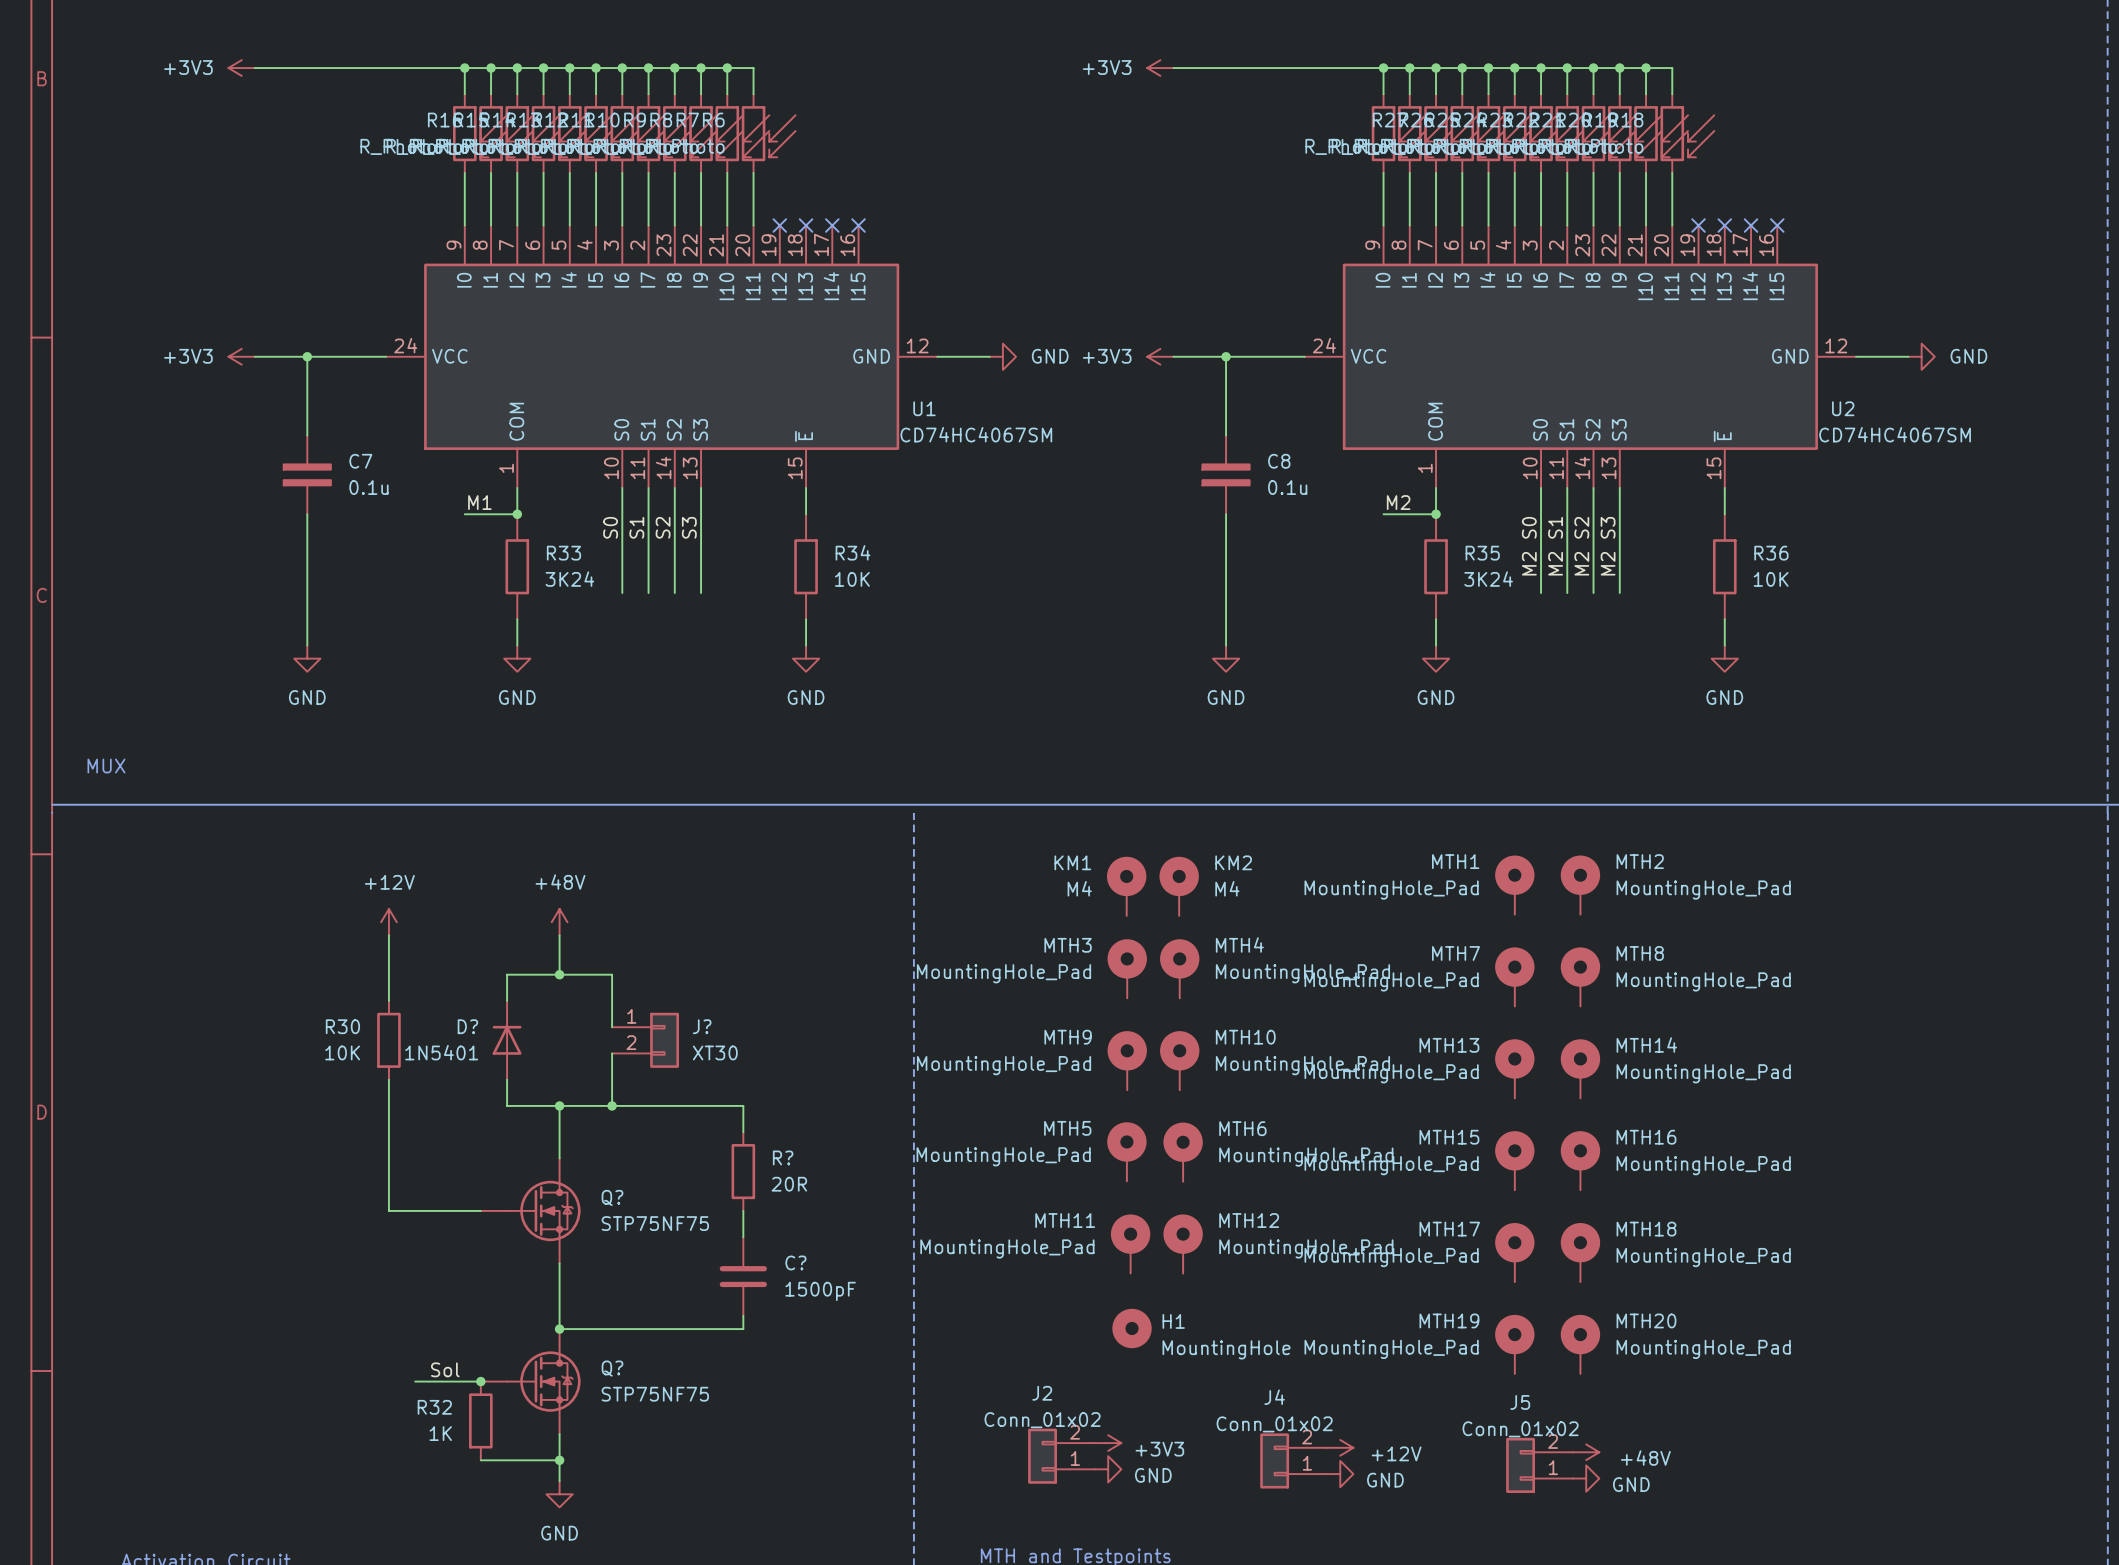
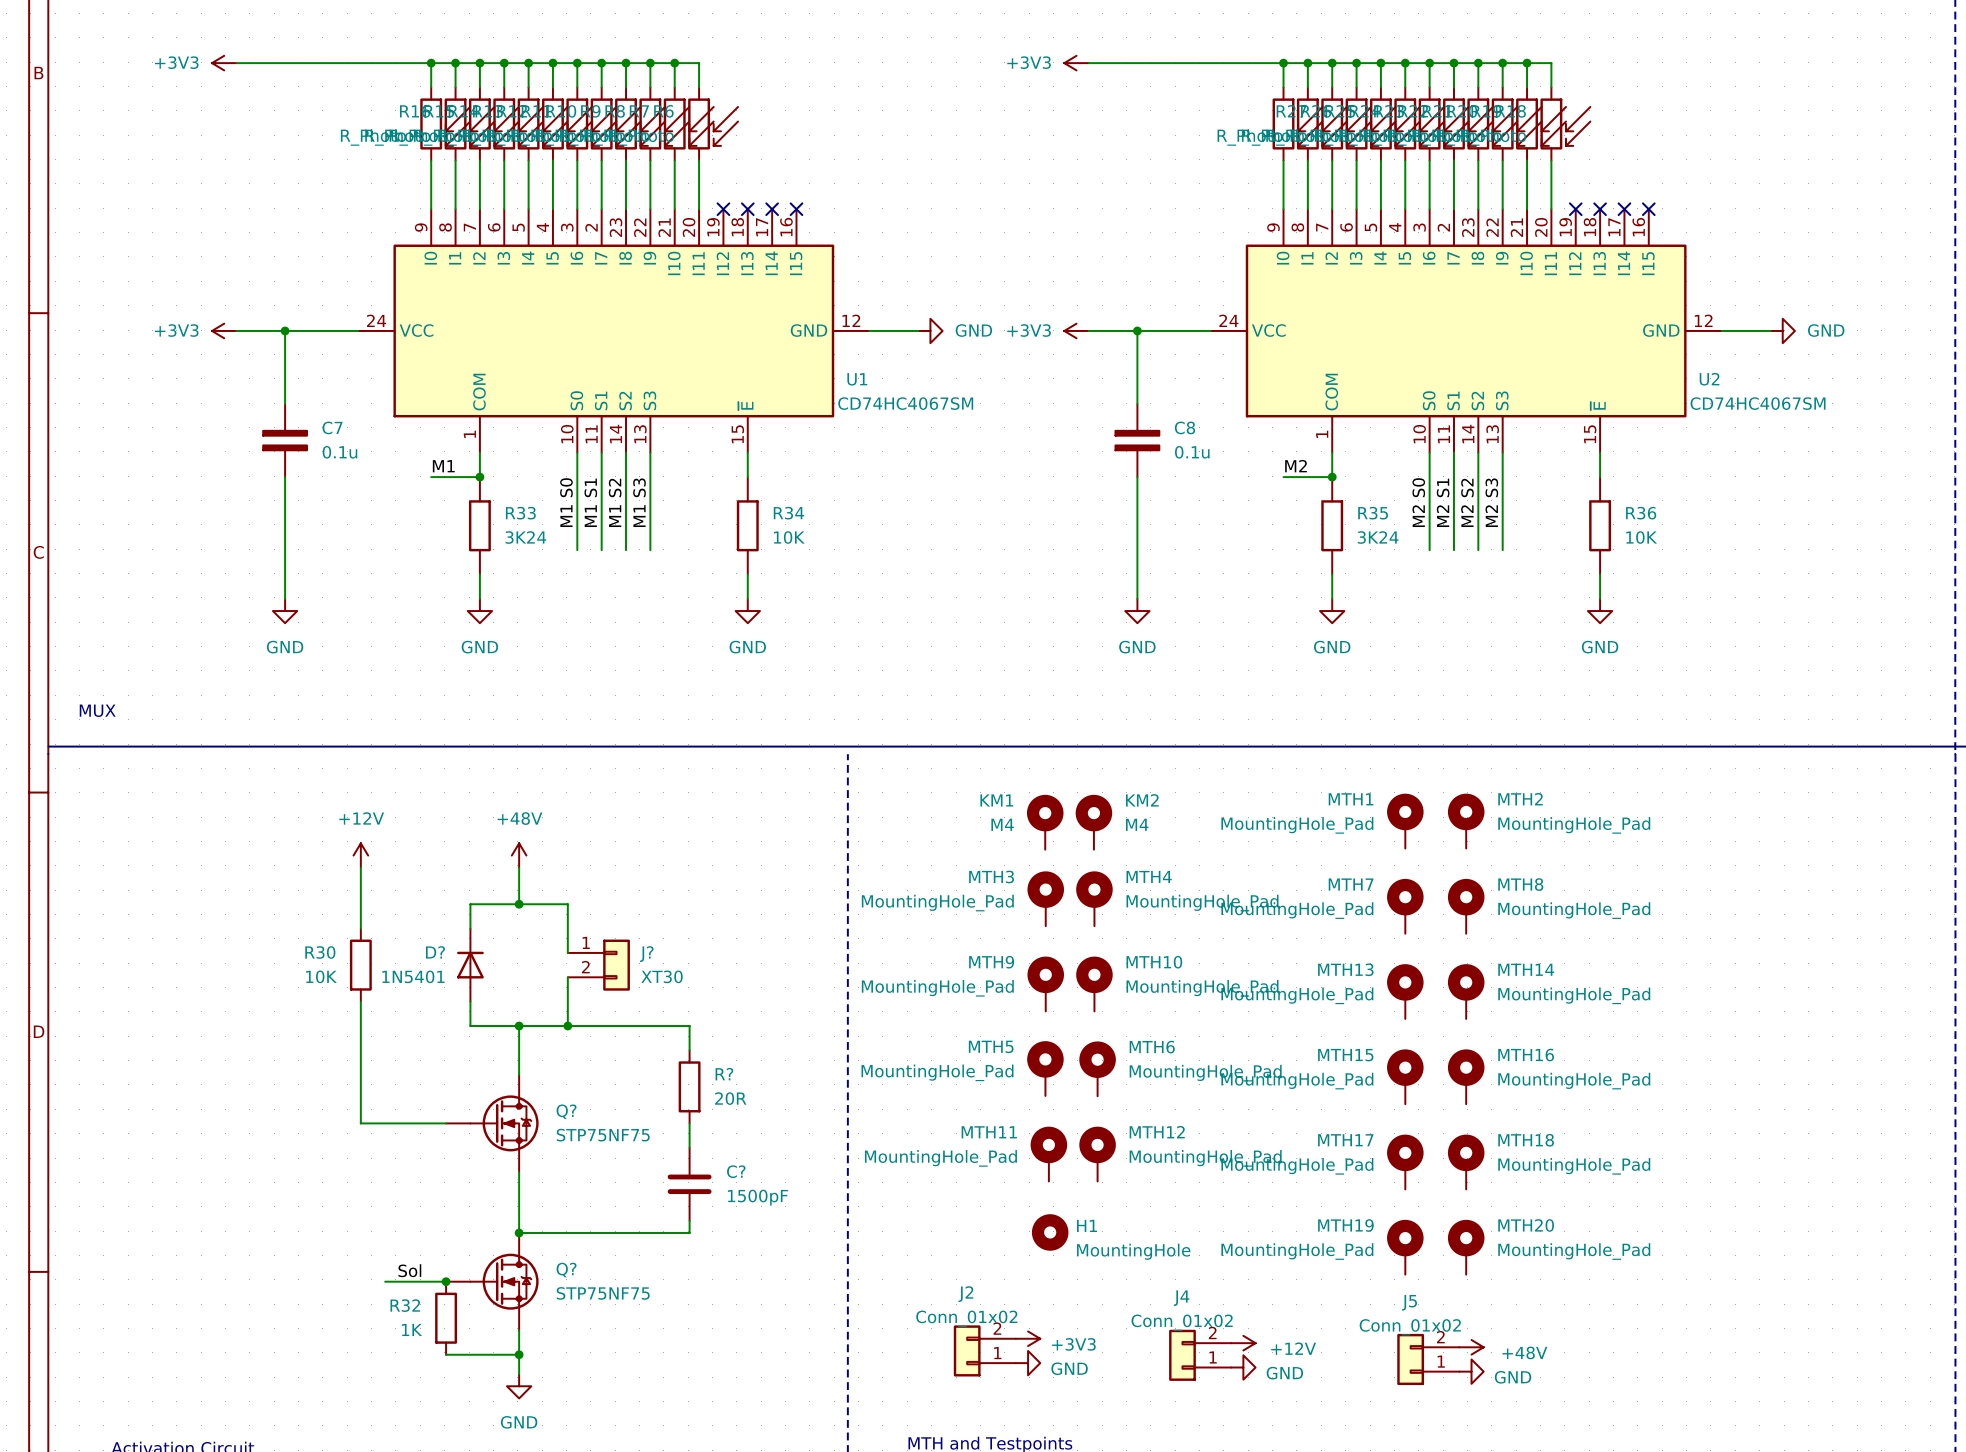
label: S0 (610, 527) -> M1 S0 (566, 502)
label: S1 (636, 527) -> M1 S1 (590, 502)
label: S2 (663, 527) -> M1 S2 (615, 502)
label: S3 (689, 527) -> M1 S3 (639, 502)

